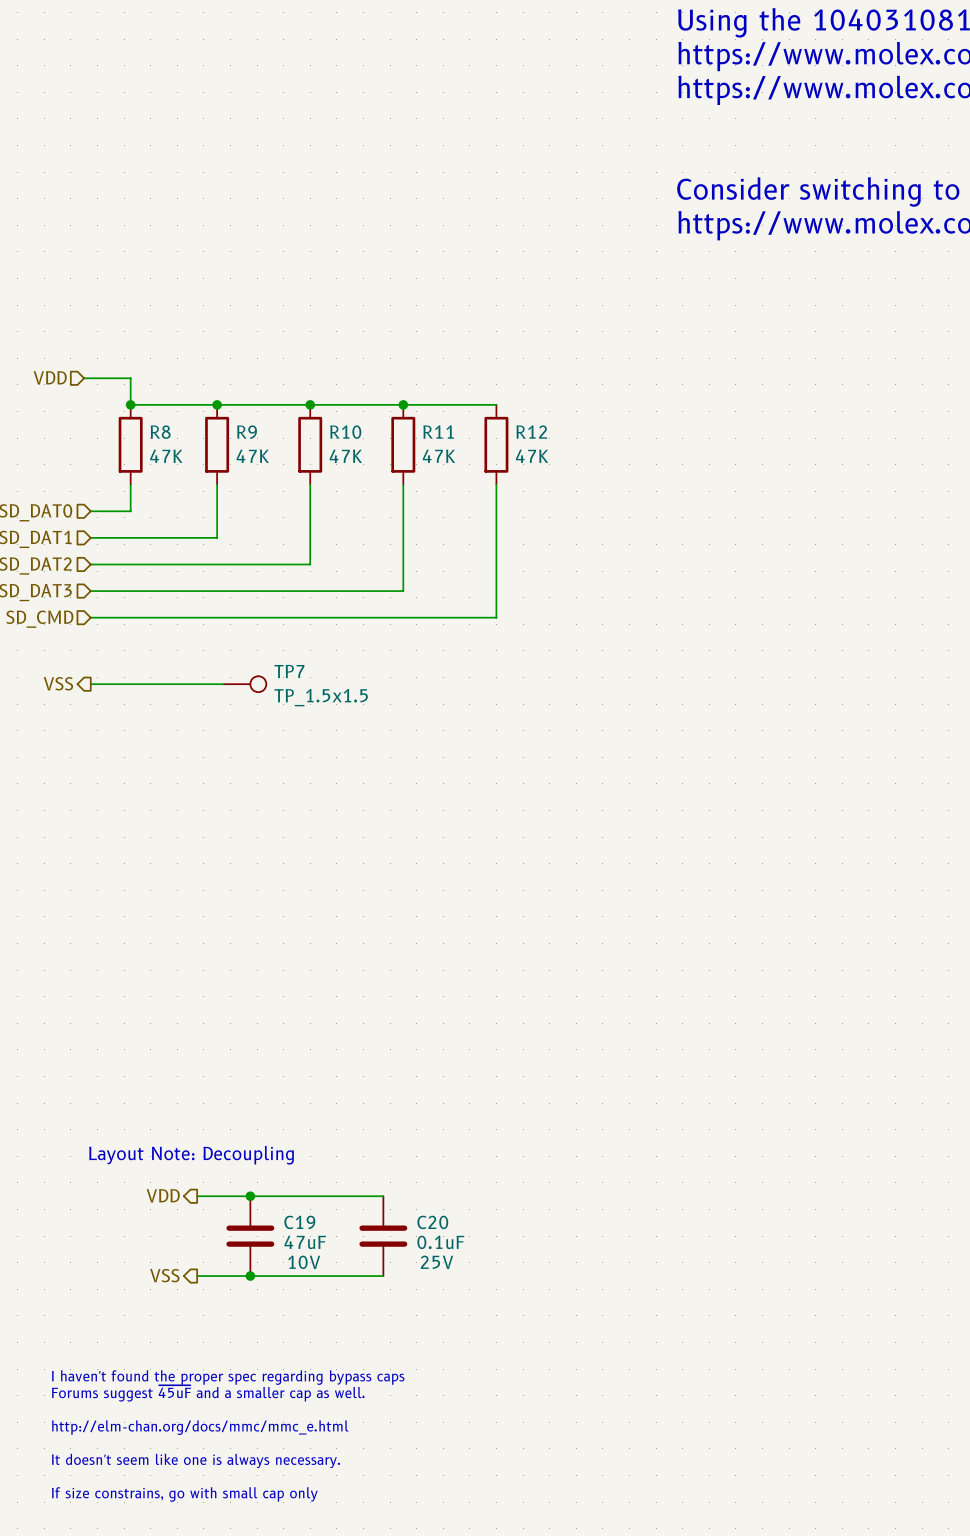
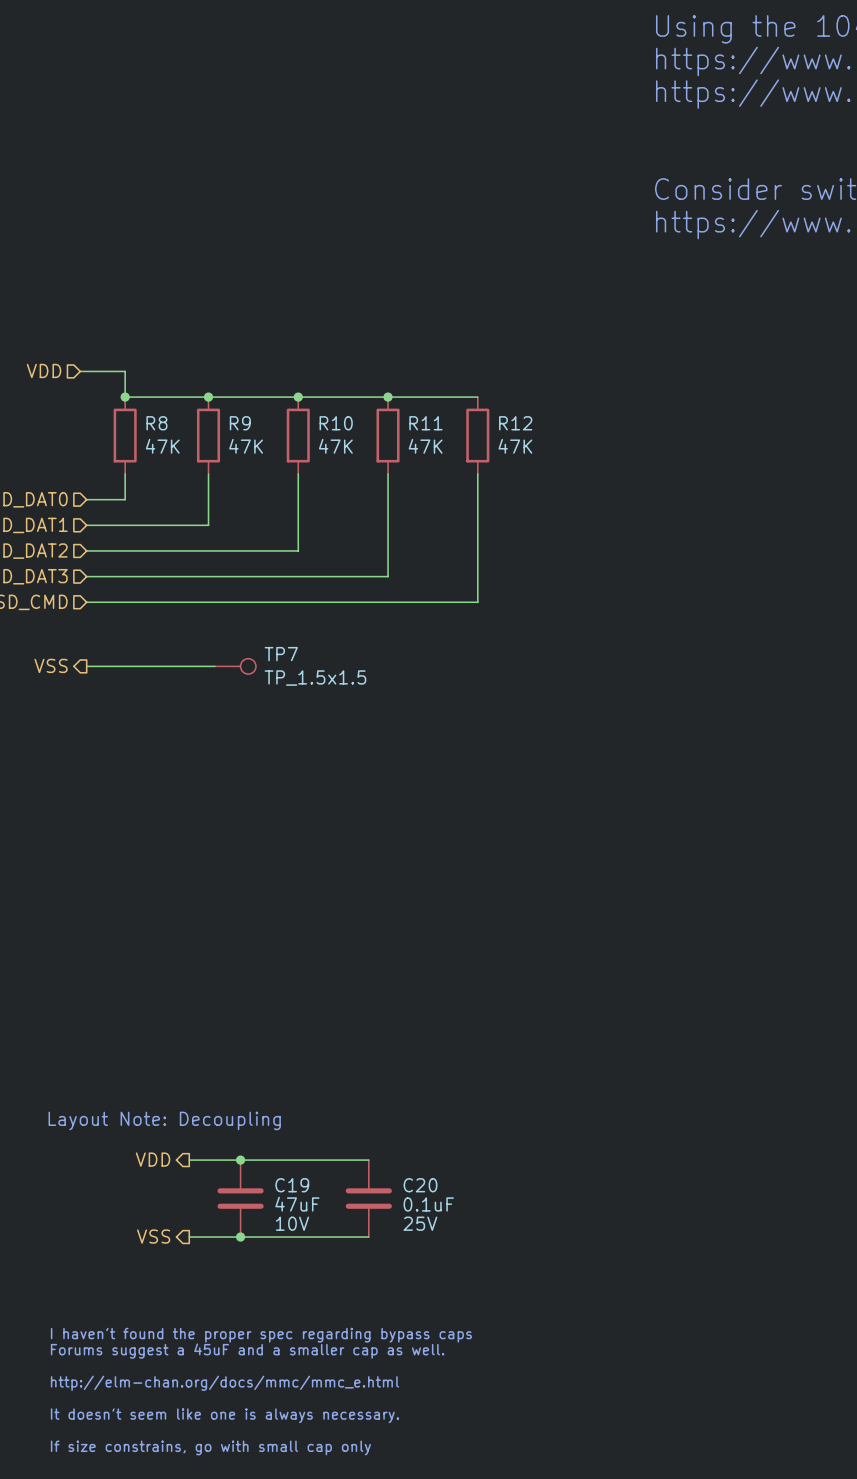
text: Forums suggest ~{45uF} and a smaller cap as well. (208, 1393) -> Forums suggest a 45uF and a smaller cap as well. (247, 1351)

